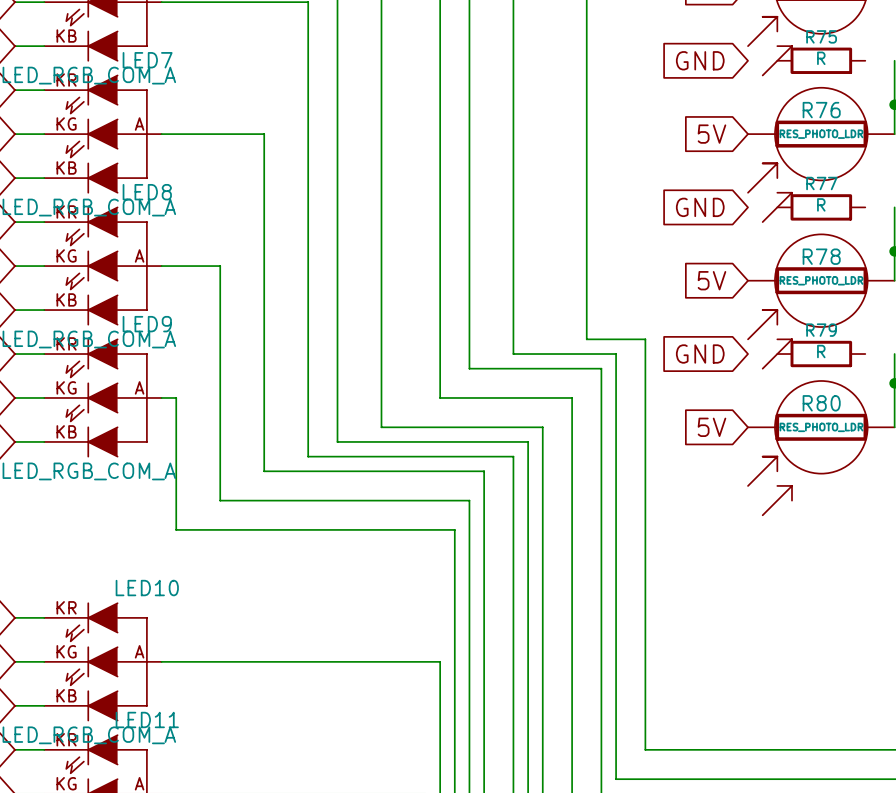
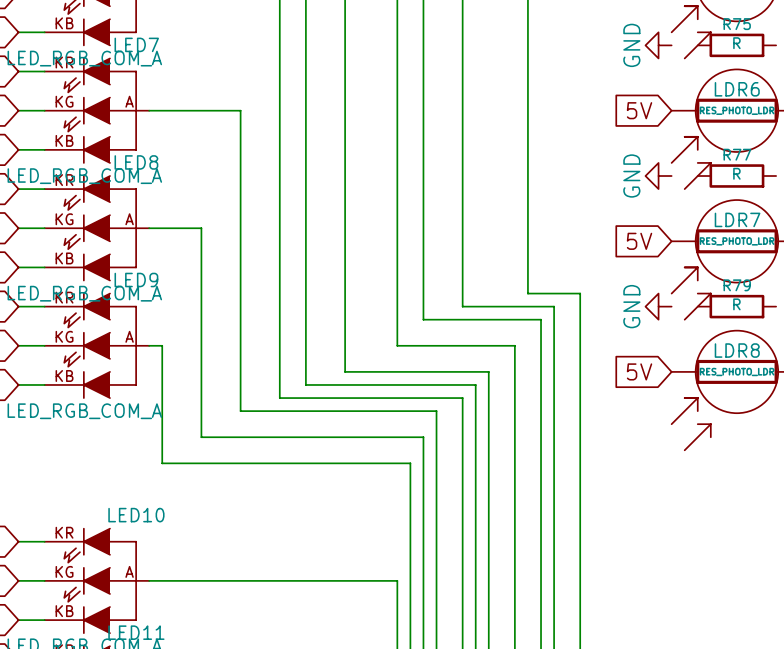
global label: GND (700, 60) -> none
power symbol: none -> GND (658, 45)
R76 name: R76 (821, 110) -> LDR6 (737, 89)
global label: GND (700, 207) -> none
power symbol: none -> GND (658, 176)
R78 name: R78 (821, 256) -> LDR7 (737, 219)
global label: GND (700, 354) -> none
power symbol: none -> GND (658, 306)
R80 name: R80 (821, 403) -> LDR8 (737, 350)

